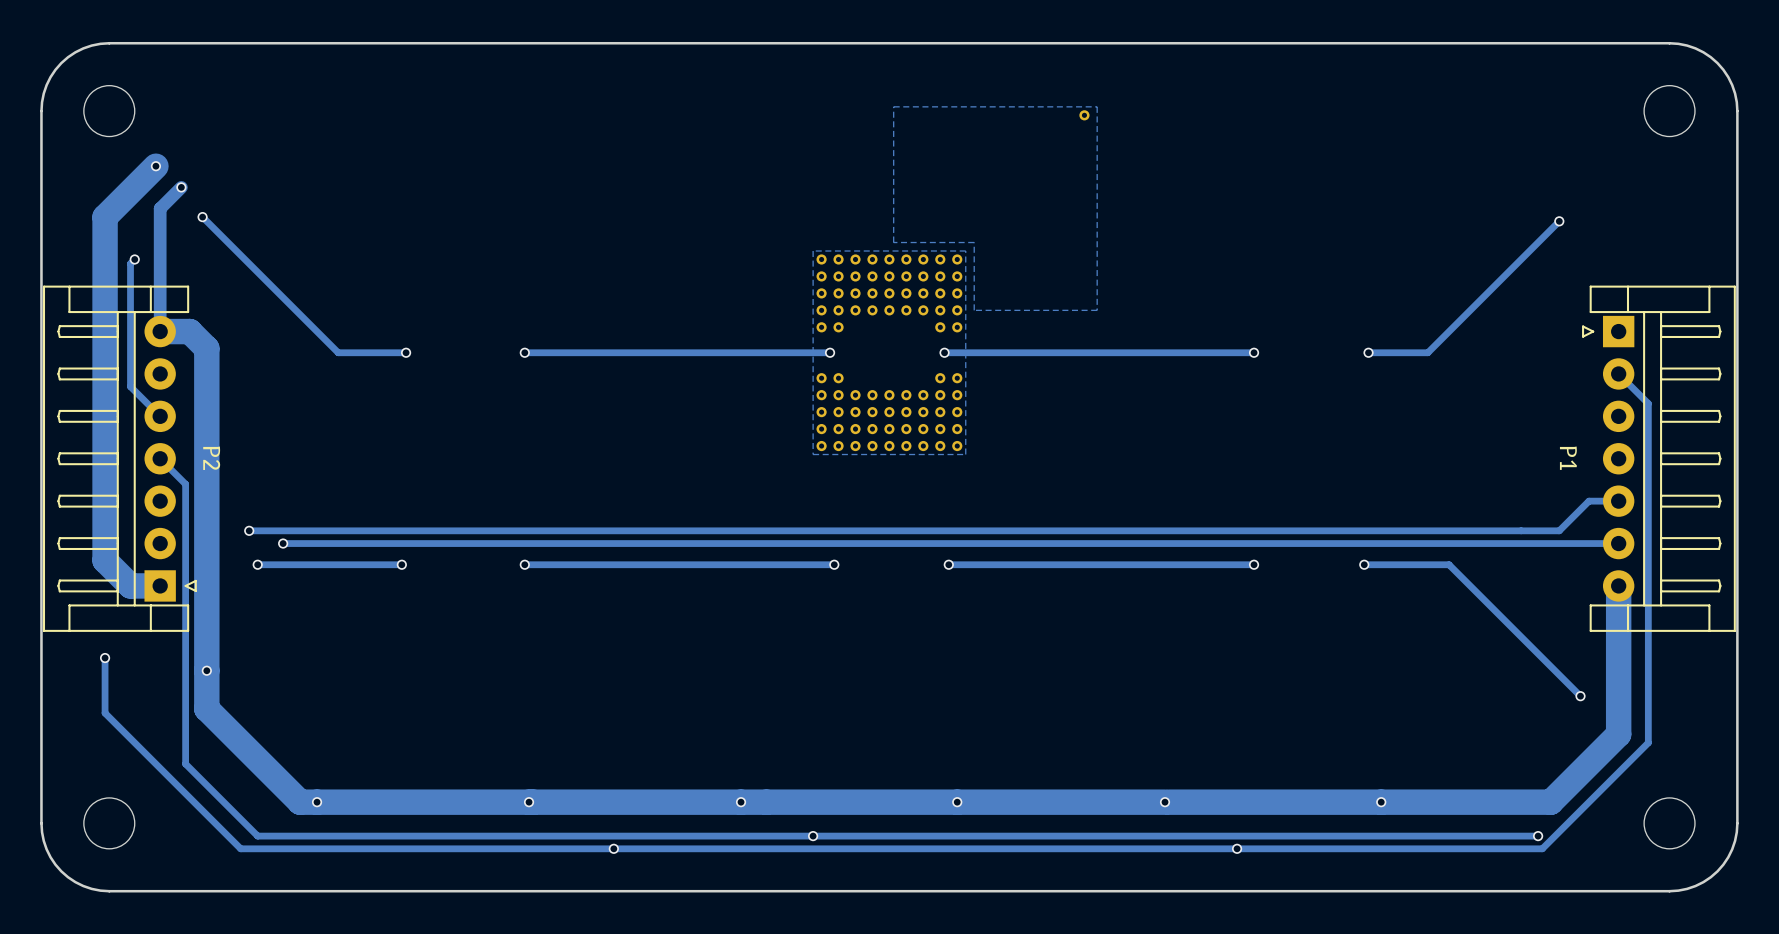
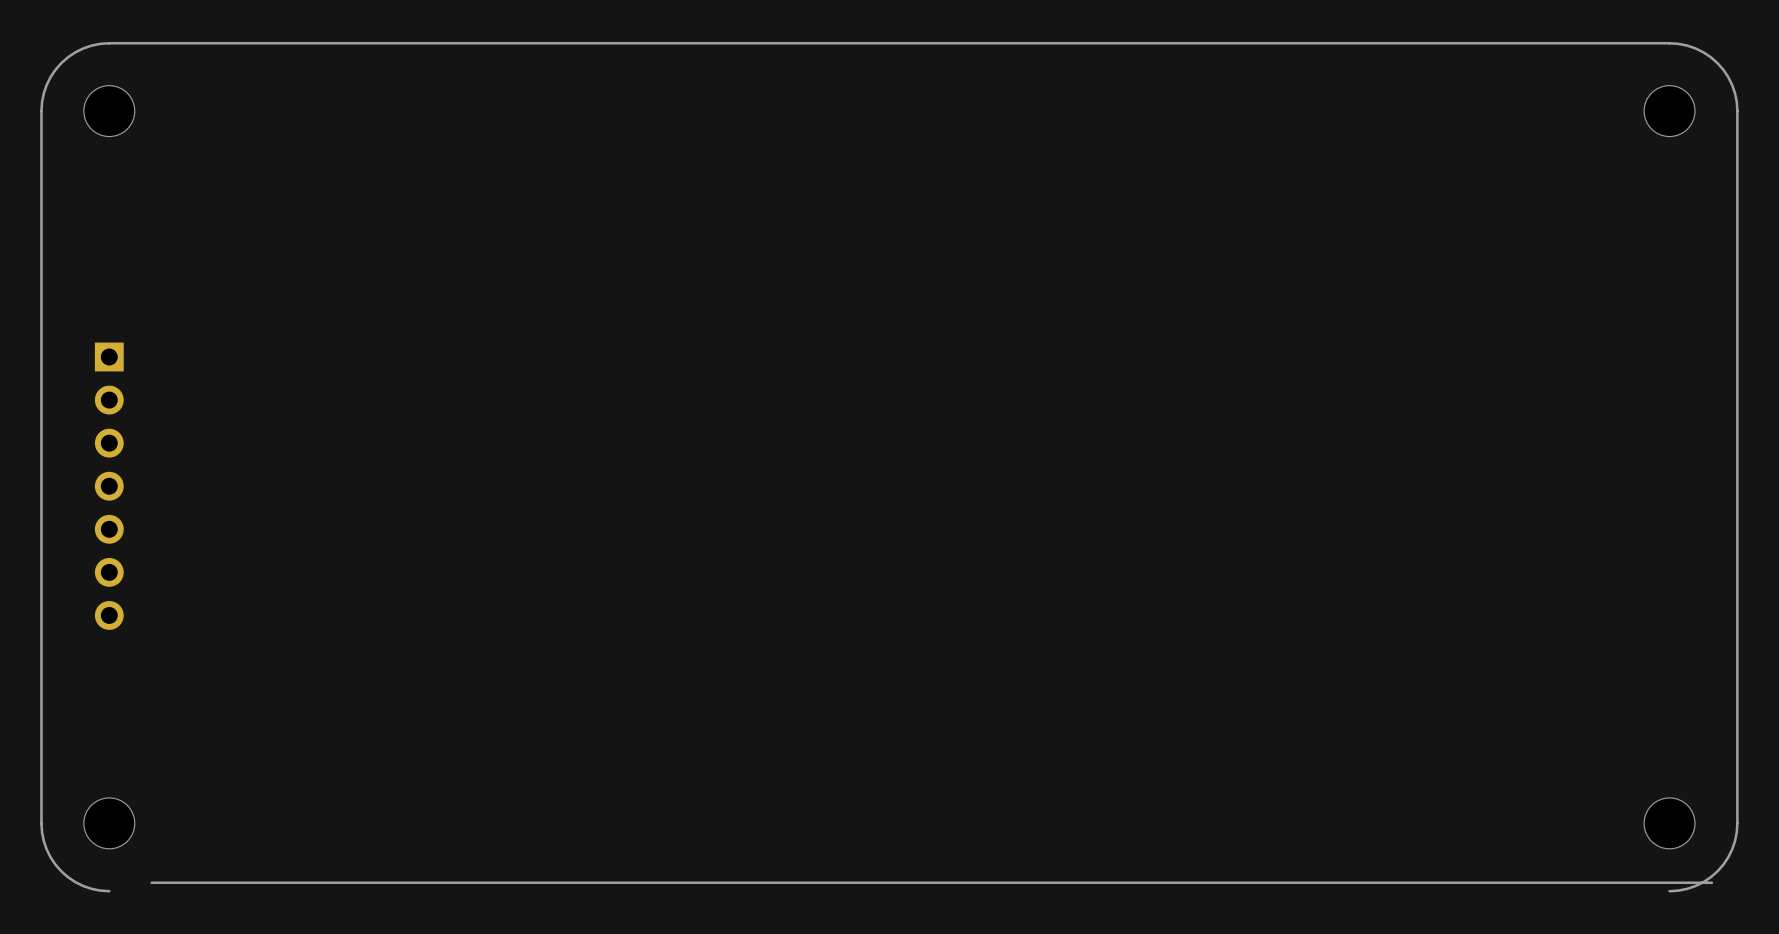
zone outline: (1097, 106) (893, 106) (893, 242) (974, 242) (974, 310) (1097, 310) (1097, 106) -> none
part: (1084, 115) -> none
track: (155, 166) (105, 217) (105, 560) (130, 585) (160, 585) -> none
via: (155, 166) -> none
track: (181, 187) (160, 208) (160, 331) (189, 331) (206, 348) (206, 708) (300, 802) (1550, 802) (1618, 734) (1618, 585) -> none
via: (181, 187) -> none
track: (202, 217) (338, 352) (406, 352) -> none
via: (202, 217) -> none
track: (1559, 221) (1427, 352) (1368, 352) -> none
via: (1559, 221) -> none
zone outline: (965, 251) (813, 251) (813, 454) (965, 454) (965, 251) -> none
track: (134, 259) (130, 263) (130, 386) (160, 416) -> none
via: (134, 259) -> none
part: (821, 259) -> none
part: (838, 259) -> none
part: (855, 259) -> none
part: (872, 259) -> none
part: (889, 259) -> none
part: (906, 259) -> none
part: (923, 259) -> none
part: (940, 259) -> none
part: (957, 259) -> none
part: (821, 276) -> none
part: (838, 276) -> none
part: (855, 276) -> none
part: (872, 276) -> none
part: (889, 276) -> none
part: (906, 276) -> none
part: (923, 276) -> none
part: (940, 276) -> none
part: (957, 276) -> none
part: (821, 293) -> none
part: (838, 293) -> none
part: (855, 293) -> none
part: (872, 293) -> none
part: (889, 293) -> none
part: (906, 293) -> none
part: (923, 293) -> none
part: (940, 293) -> none
part: (957, 293) -> none
part: (821, 310) -> none
part: (838, 310) -> none
part: (855, 310) -> none
part: (872, 310) -> none
part: (889, 310) -> none
part: (906, 310) -> none
part: (923, 310) -> none
part: (940, 310) -> none
part: (957, 310) -> none
part: (821, 327) -> none
part: (838, 327) -> none
part: (940, 327) -> none
part: (957, 327) -> none
via: (406, 352) -> none
via: (524, 352) -> none
track: (830, 352) (524, 352) -> none
via: (830, 352) -> none
via: (944, 352) -> none
track: (1254, 352) (944, 352) -> none
via: (1254, 352) -> none
via: (1368, 352) -> none
track: (1618, 373) (1648, 403) (1648, 742) (1542, 848) (240, 848) (105, 713) (105, 658) -> none
part: (821, 378) -> none
part: (838, 378) -> none
part: (940, 378) -> none
part: (957, 378) -> none
part: (821, 395) -> none
part: (838, 395) -> none
part: (855, 395) -> none
part: (872, 395) -> none
part: (889, 395) -> none
part: (906, 395) -> none
part: (923, 395) -> none
part: (940, 395) -> none
part: (957, 395) -> none
part: (821, 412) -> none
part: (838, 412) -> none
part: (855, 412) -> none
part: (872, 412) -> none
part: (889, 412) -> none
part: (906, 412) -> none
part: (923, 412) -> none
part: (940, 412) -> none
part: (957, 412) -> none
part: (821, 429) -> none
part: (838, 429) -> none
part: (855, 429) -> none
part: (872, 429) -> none
part: (889, 429) -> none
part: (906, 429) -> none
part: (923, 429) -> none
part: (940, 429) -> none
part: (957, 429) -> none
part: (821, 446) -> none
part: (838, 446) -> none
part: (855, 446) -> none
part: (872, 446) -> none
part: (889, 446) -> none
part: (906, 446) -> none
part: (923, 446) -> none
part: (940, 446) -> none
part: (957, 446) -> none
P2: (119, 458) -> none
track: (160, 458) (185, 484) (185, 764) (257, 836) (1538, 836) -> none
P1: (1658, 458) -> none
part: none -> (109, 486)
track: (1618, 501) (1588, 501) (1559, 530) (249, 530) -> none
via: (249, 530) -> none
via: (283, 543) -> none
track: (1618, 543) (283, 543) -> none
via: (257, 564) -> none
track: (401, 564) (257, 564) -> none
via: (401, 564) -> none
via: (524, 564) -> none
track: (834, 564) (524, 564) -> none
via: (834, 564) -> none
via: (948, 564) -> none
track: (1254, 564) (948, 564) -> none
via: (1254, 564) -> none
track: (1364, 564) (1449, 564) (1580, 696) -> none
via: (1364, 564) -> none
via: (105, 658) -> none
via: (206, 670) -> none
via: (1580, 696) -> none
via: (317, 802) -> none
via: (529, 802) -> none
via: (741, 802) -> none
via: (957, 802) -> none
via: (1165, 802) -> none
via: (1381, 802) -> none
via: (813, 836) -> none
via: (1538, 836) -> none
via: (613, 848) -> none
via: (1237, 848) -> none
board edge: (1669, 891) (109, 891) -> (1711, 882) (151, 882)

